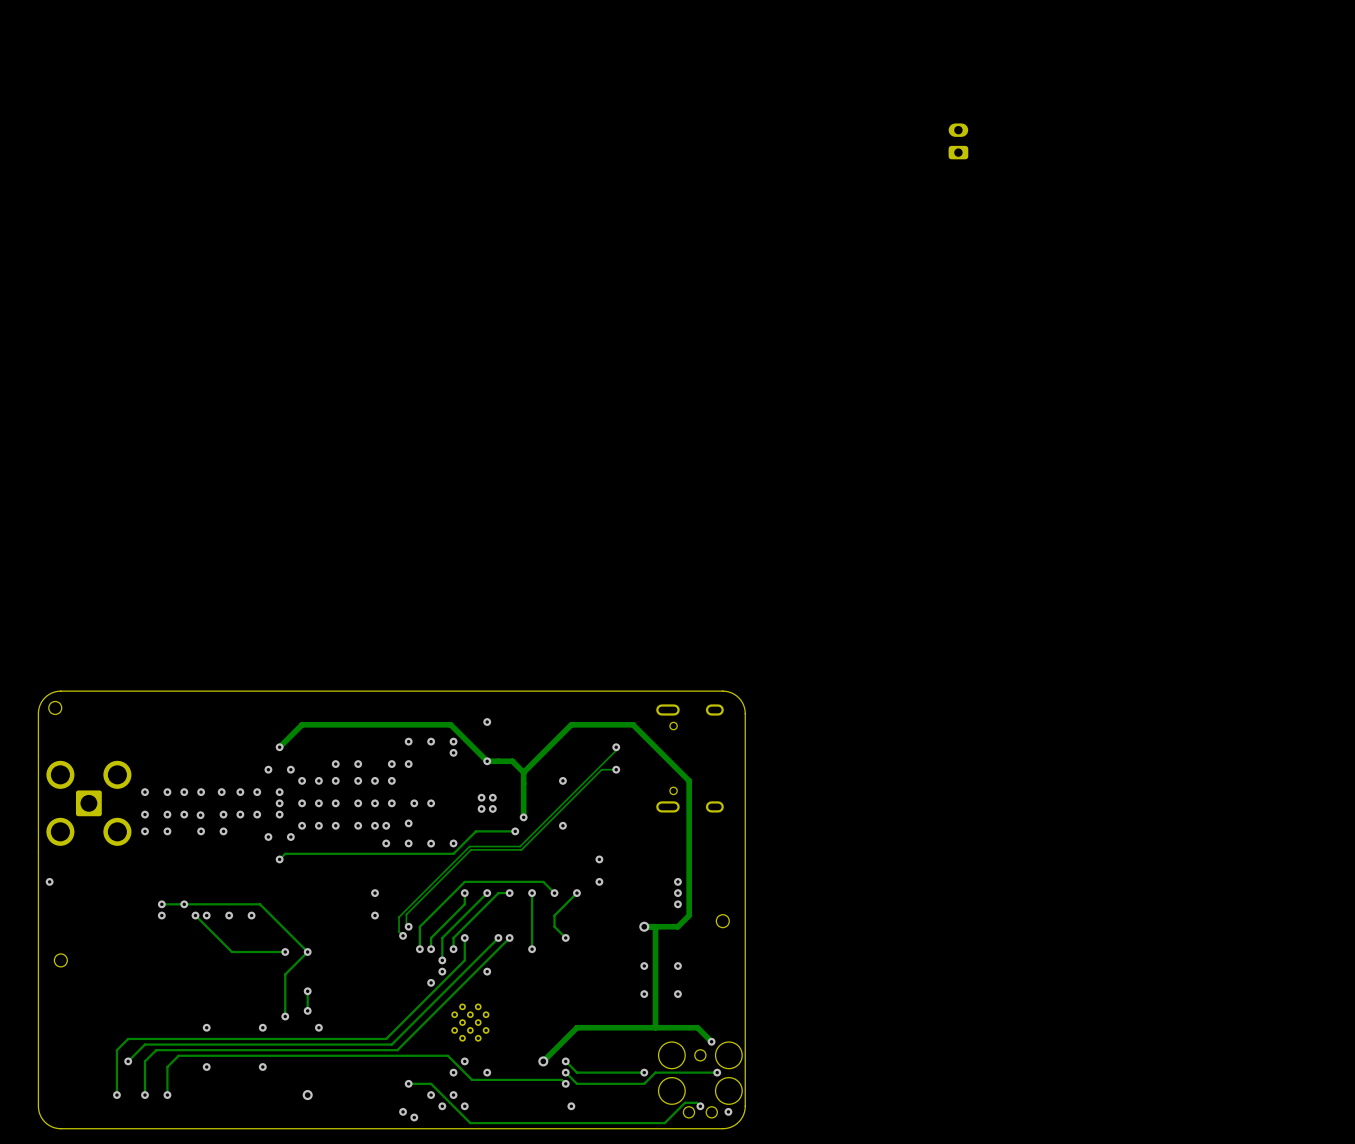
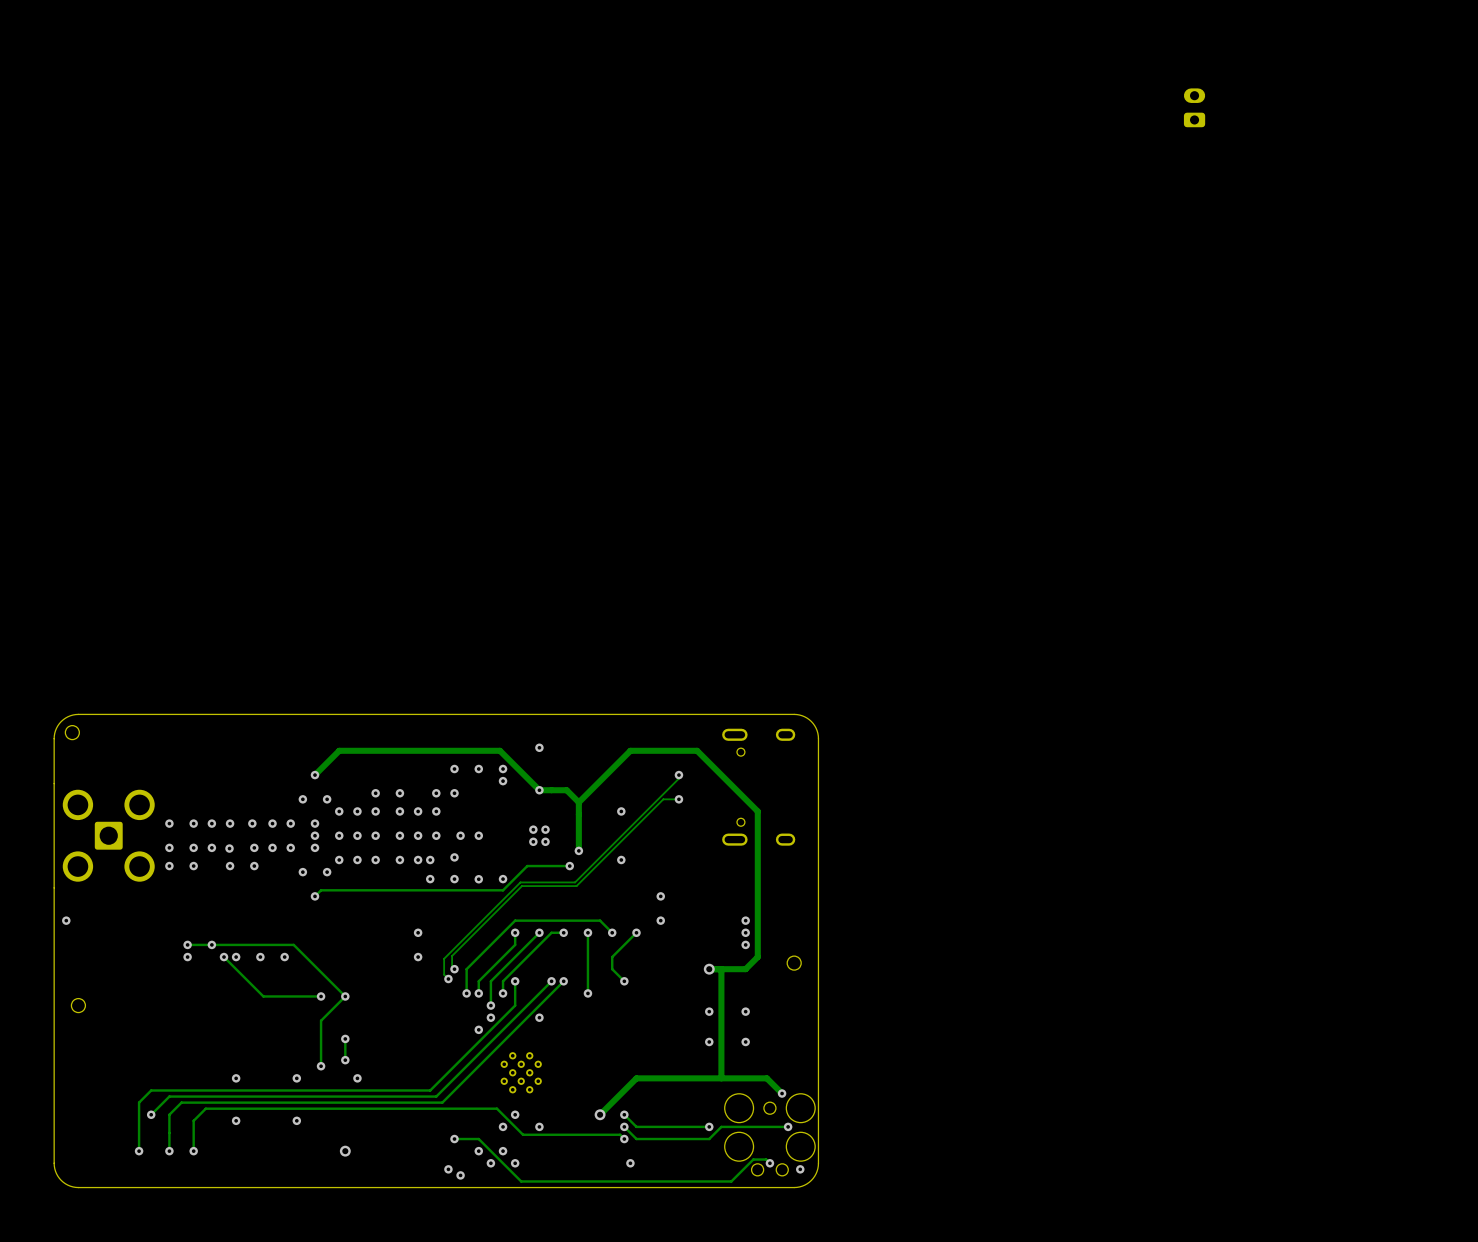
part position: (958, 141) -> (1194, 107)

